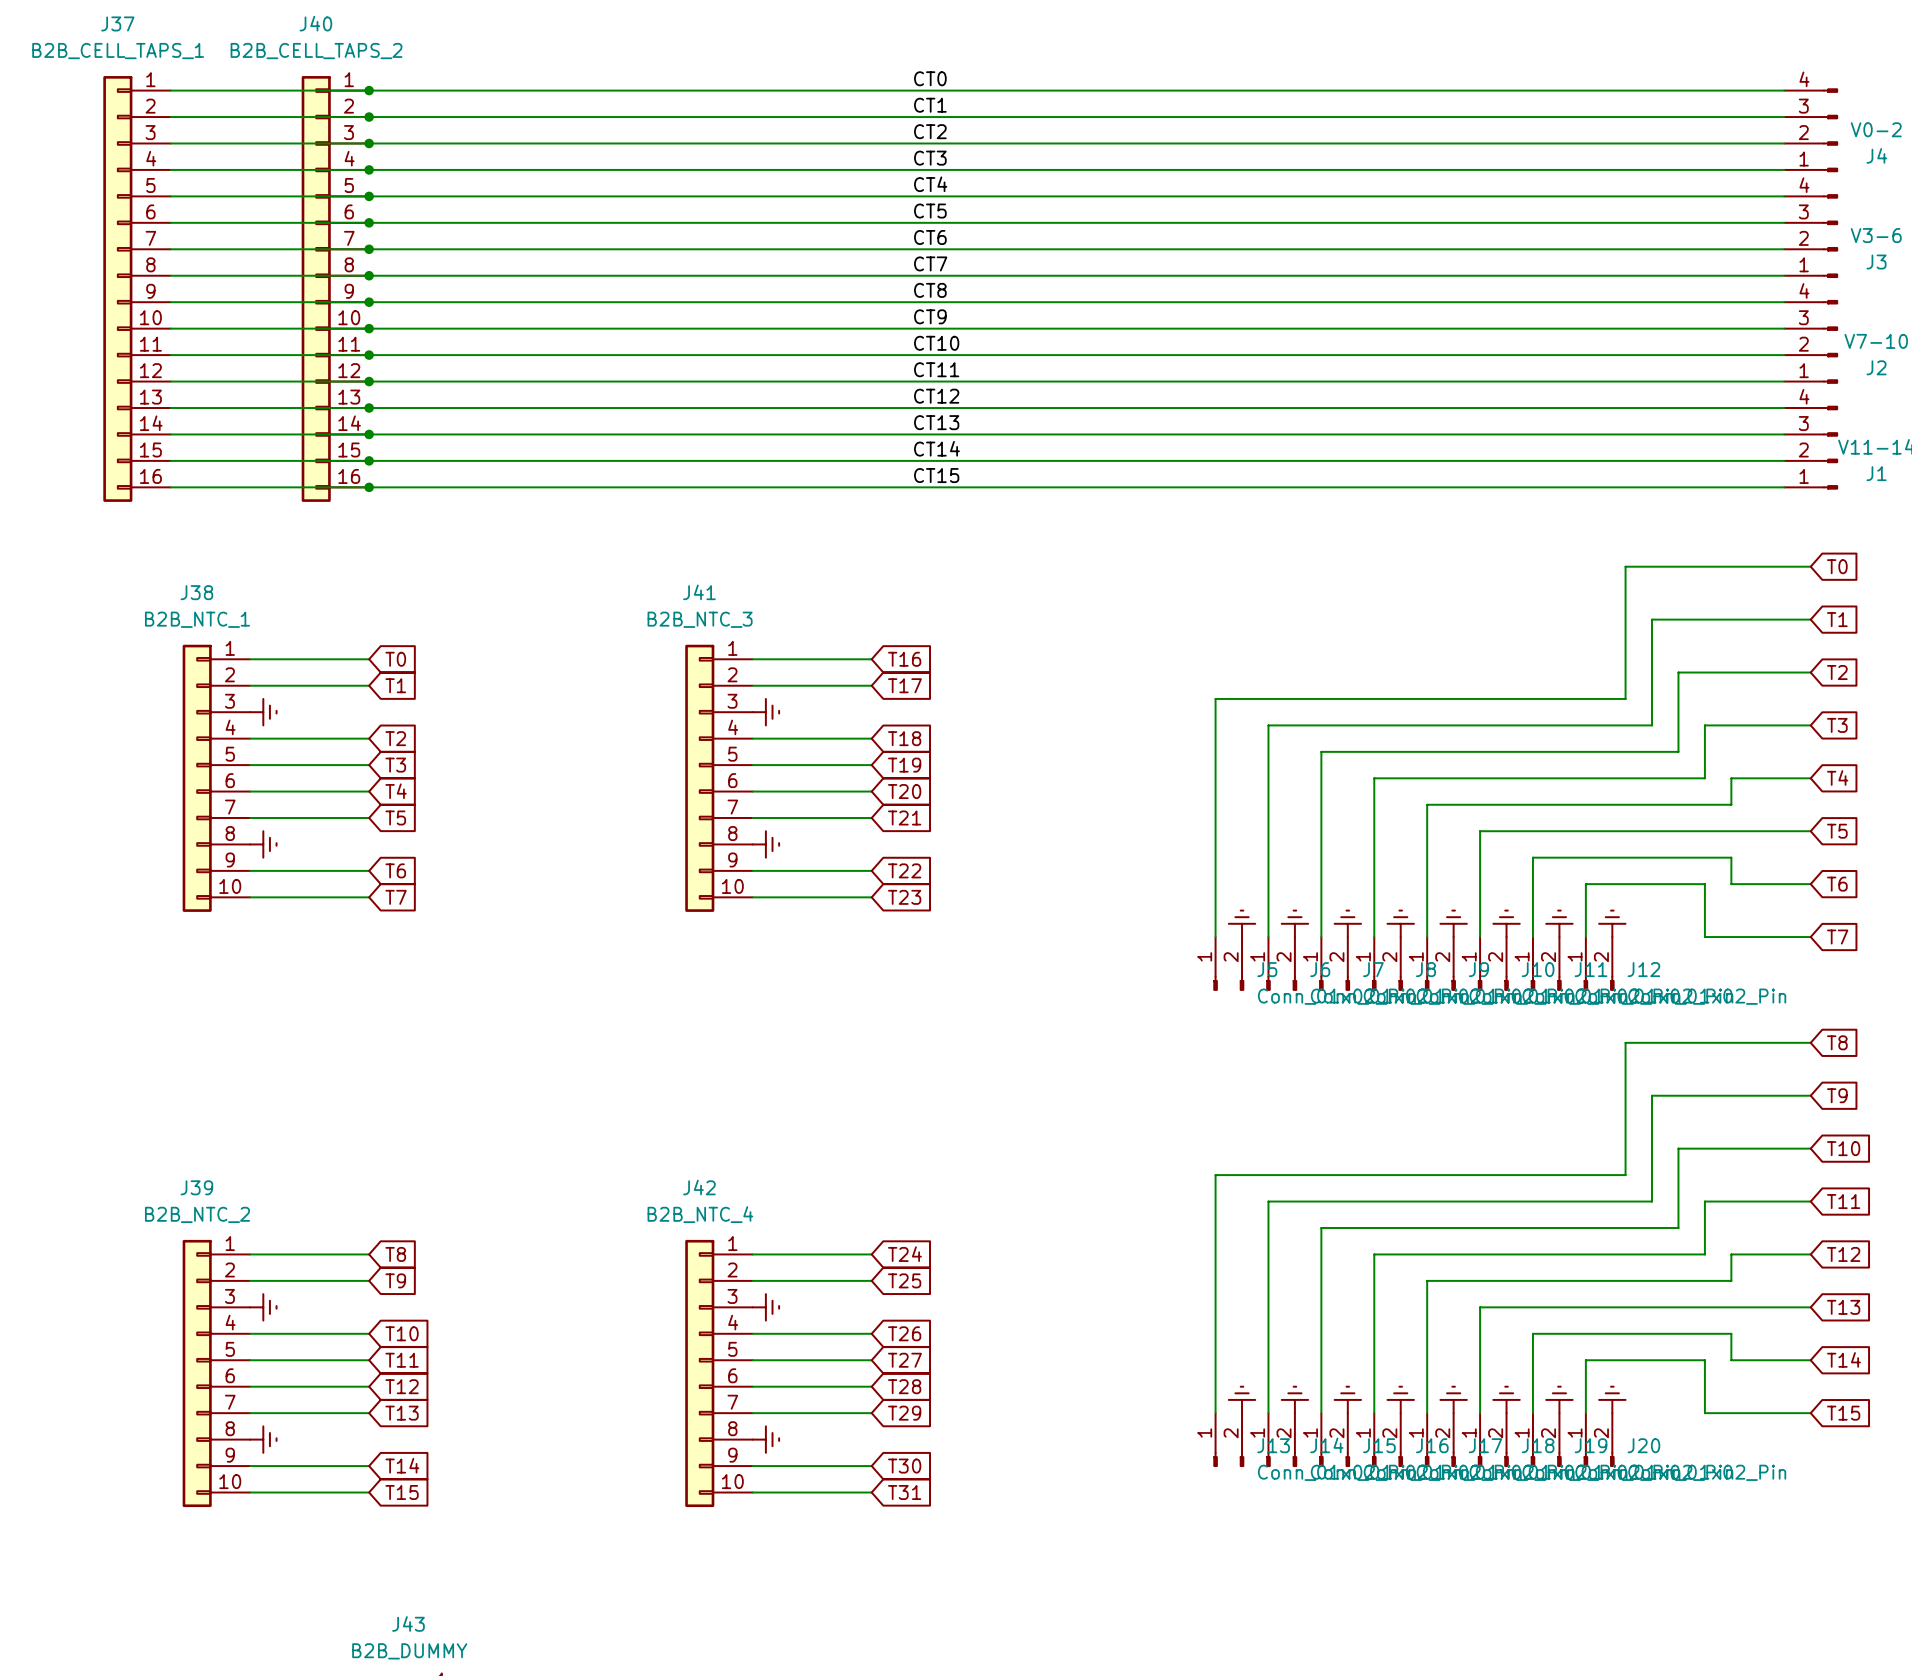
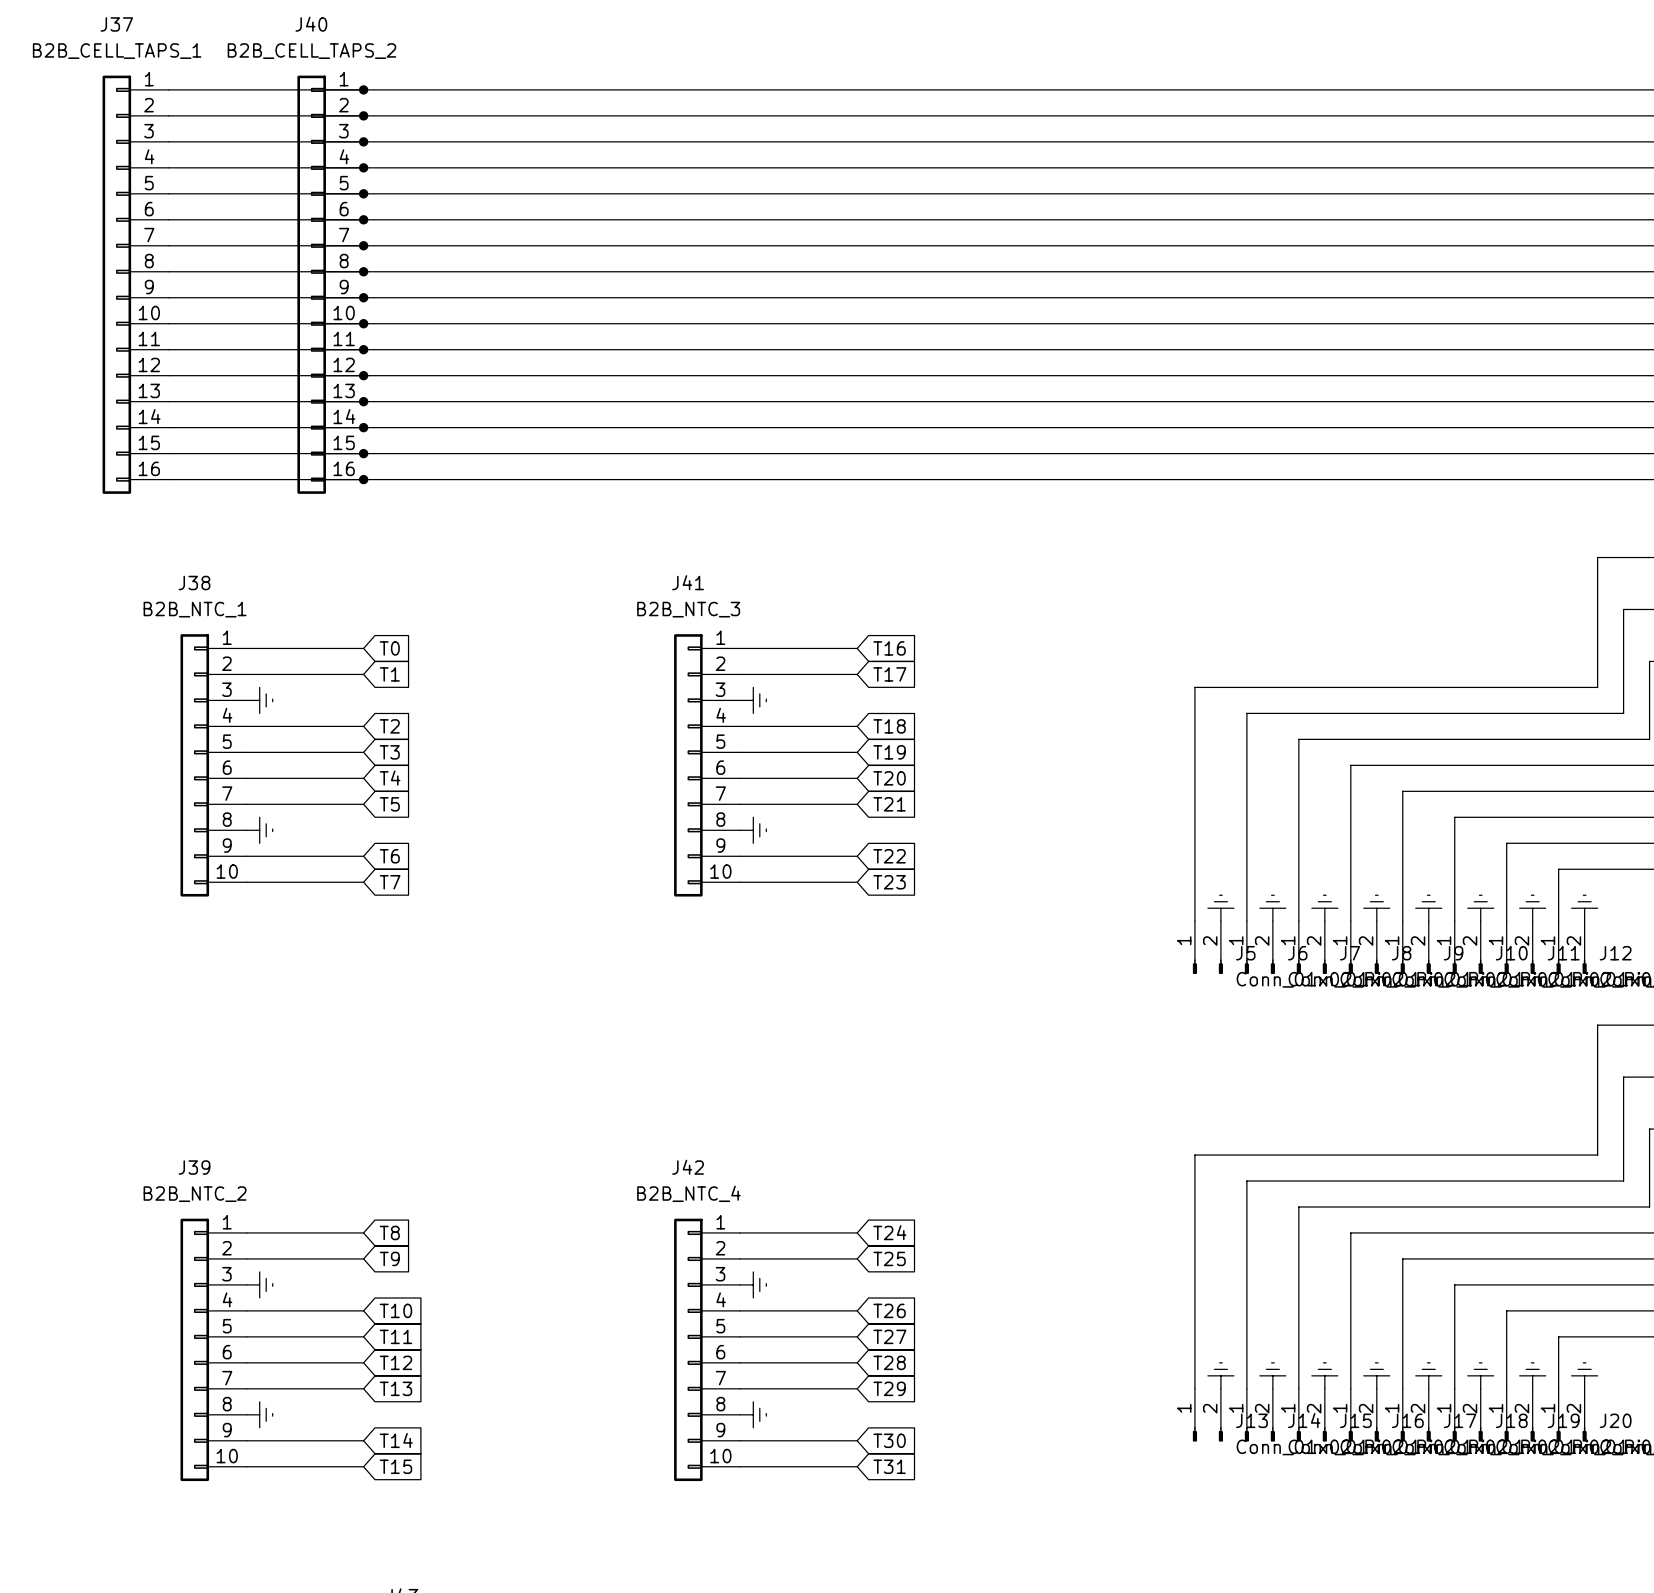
label: CT0 (930, 78) -> none
label: CT1 (930, 105) -> none
label: CT2 (930, 131) -> none
label: CT3 (930, 158) -> none
label: CT4 (930, 184) -> none
label: CT5 (930, 211) -> none
label: CT6 (930, 237) -> none
label: CT7 (930, 263) -> none
label: CT8 (930, 290) -> none
label: CT9 (930, 316) -> none
label: CT10 (936, 343) -> none
label: CT11 (936, 369) -> none
label: CT12 (936, 396) -> none
label: CT13 (936, 422) -> none
label: CT14 (936, 448) -> none
label: CT15 (936, 475) -> none

